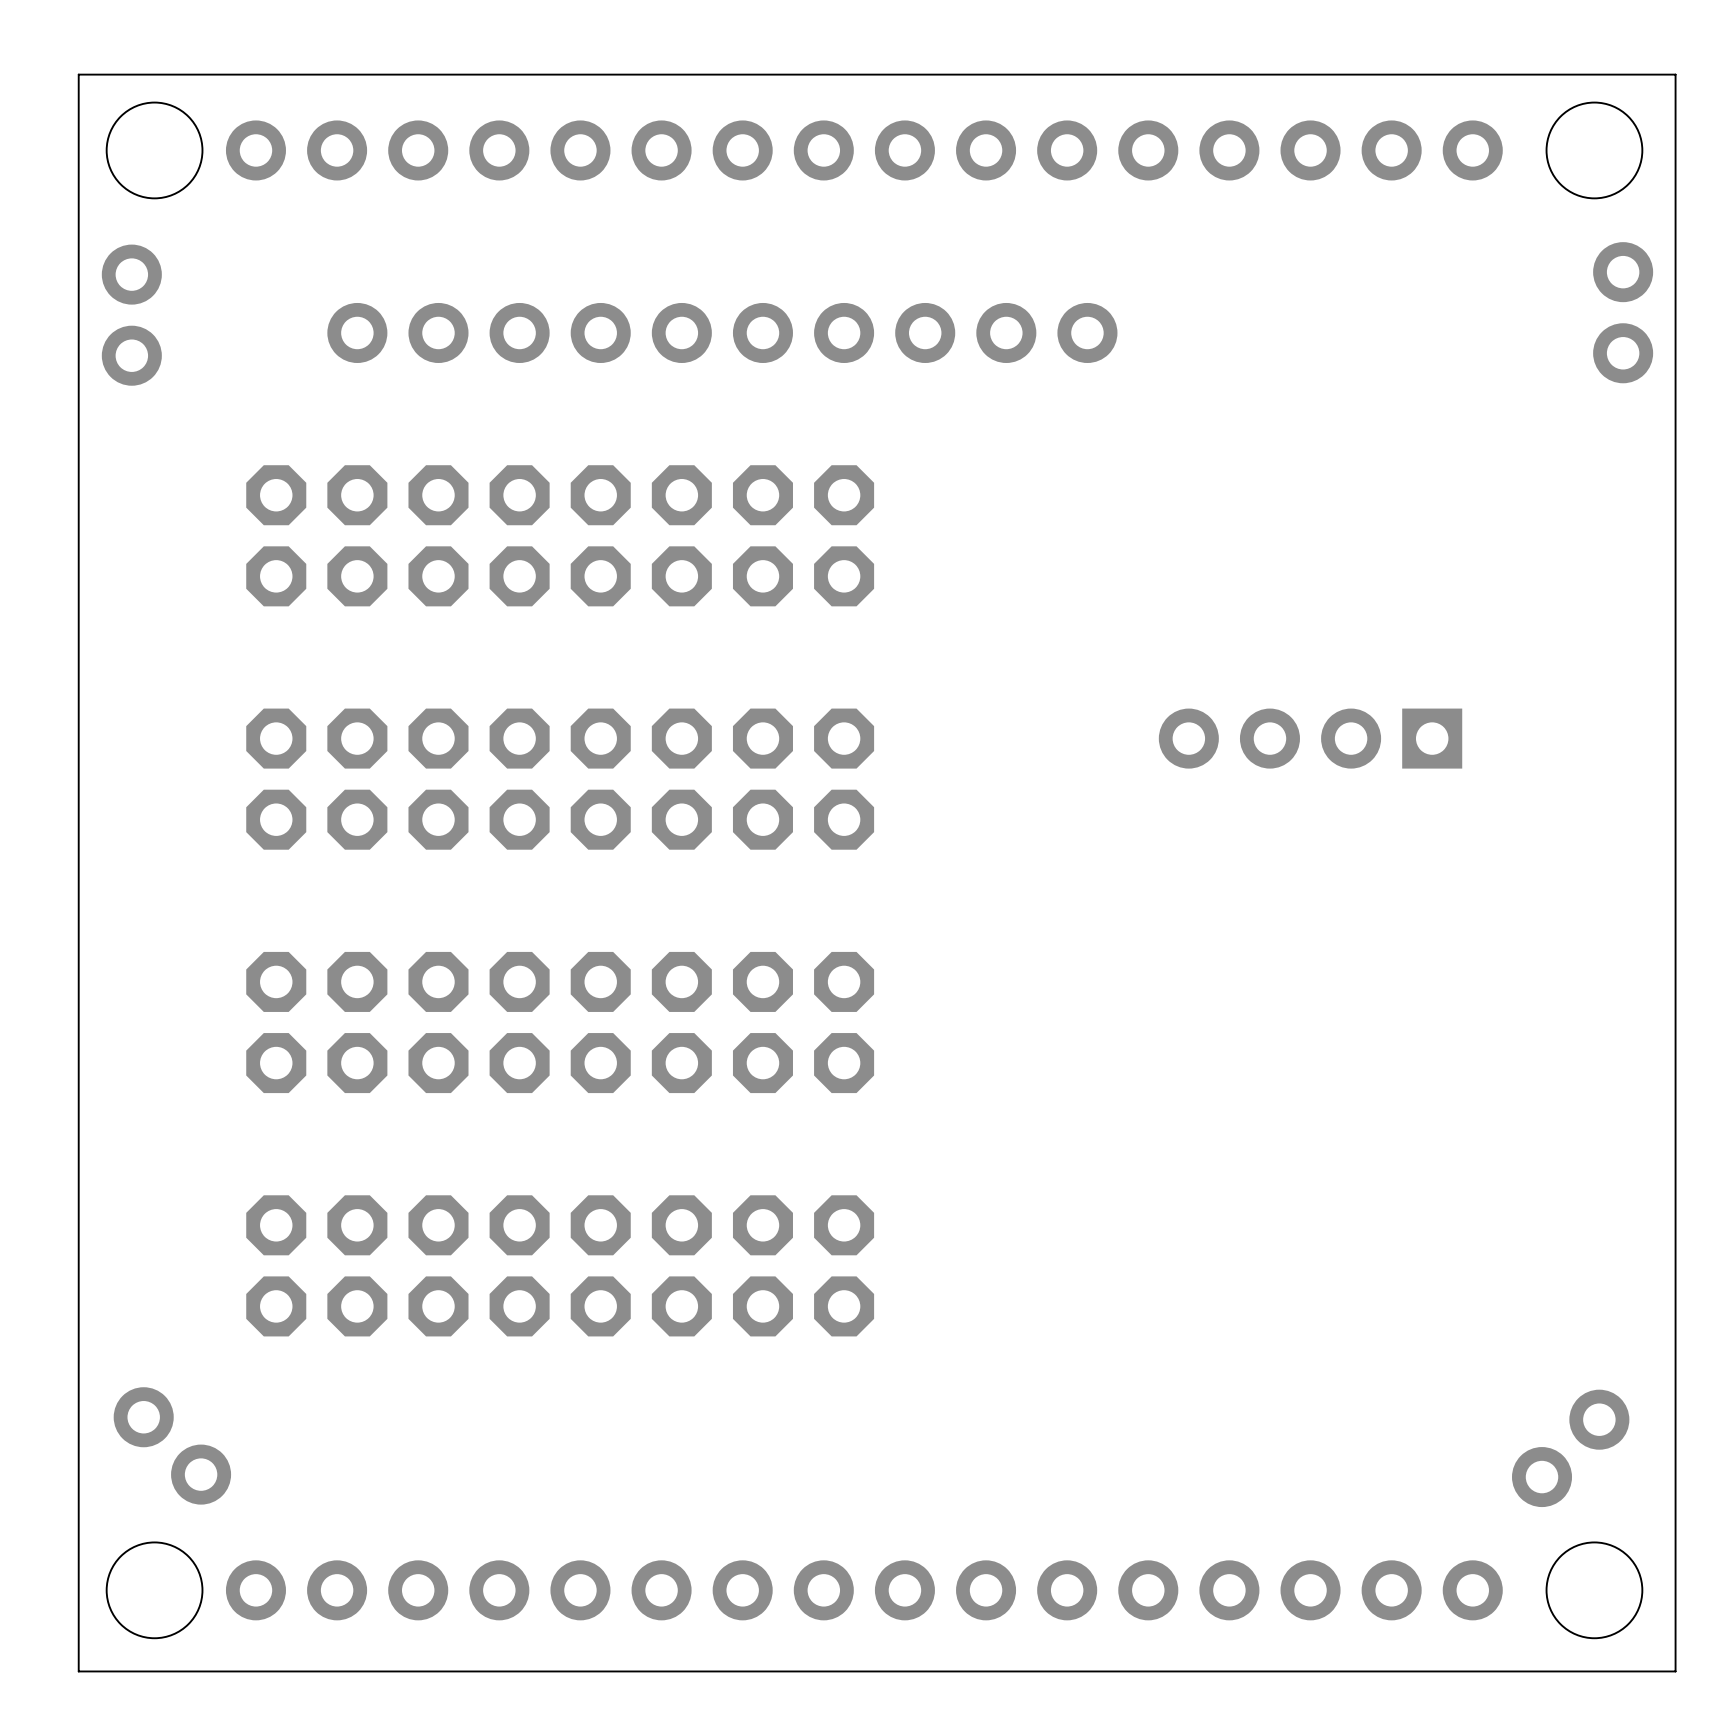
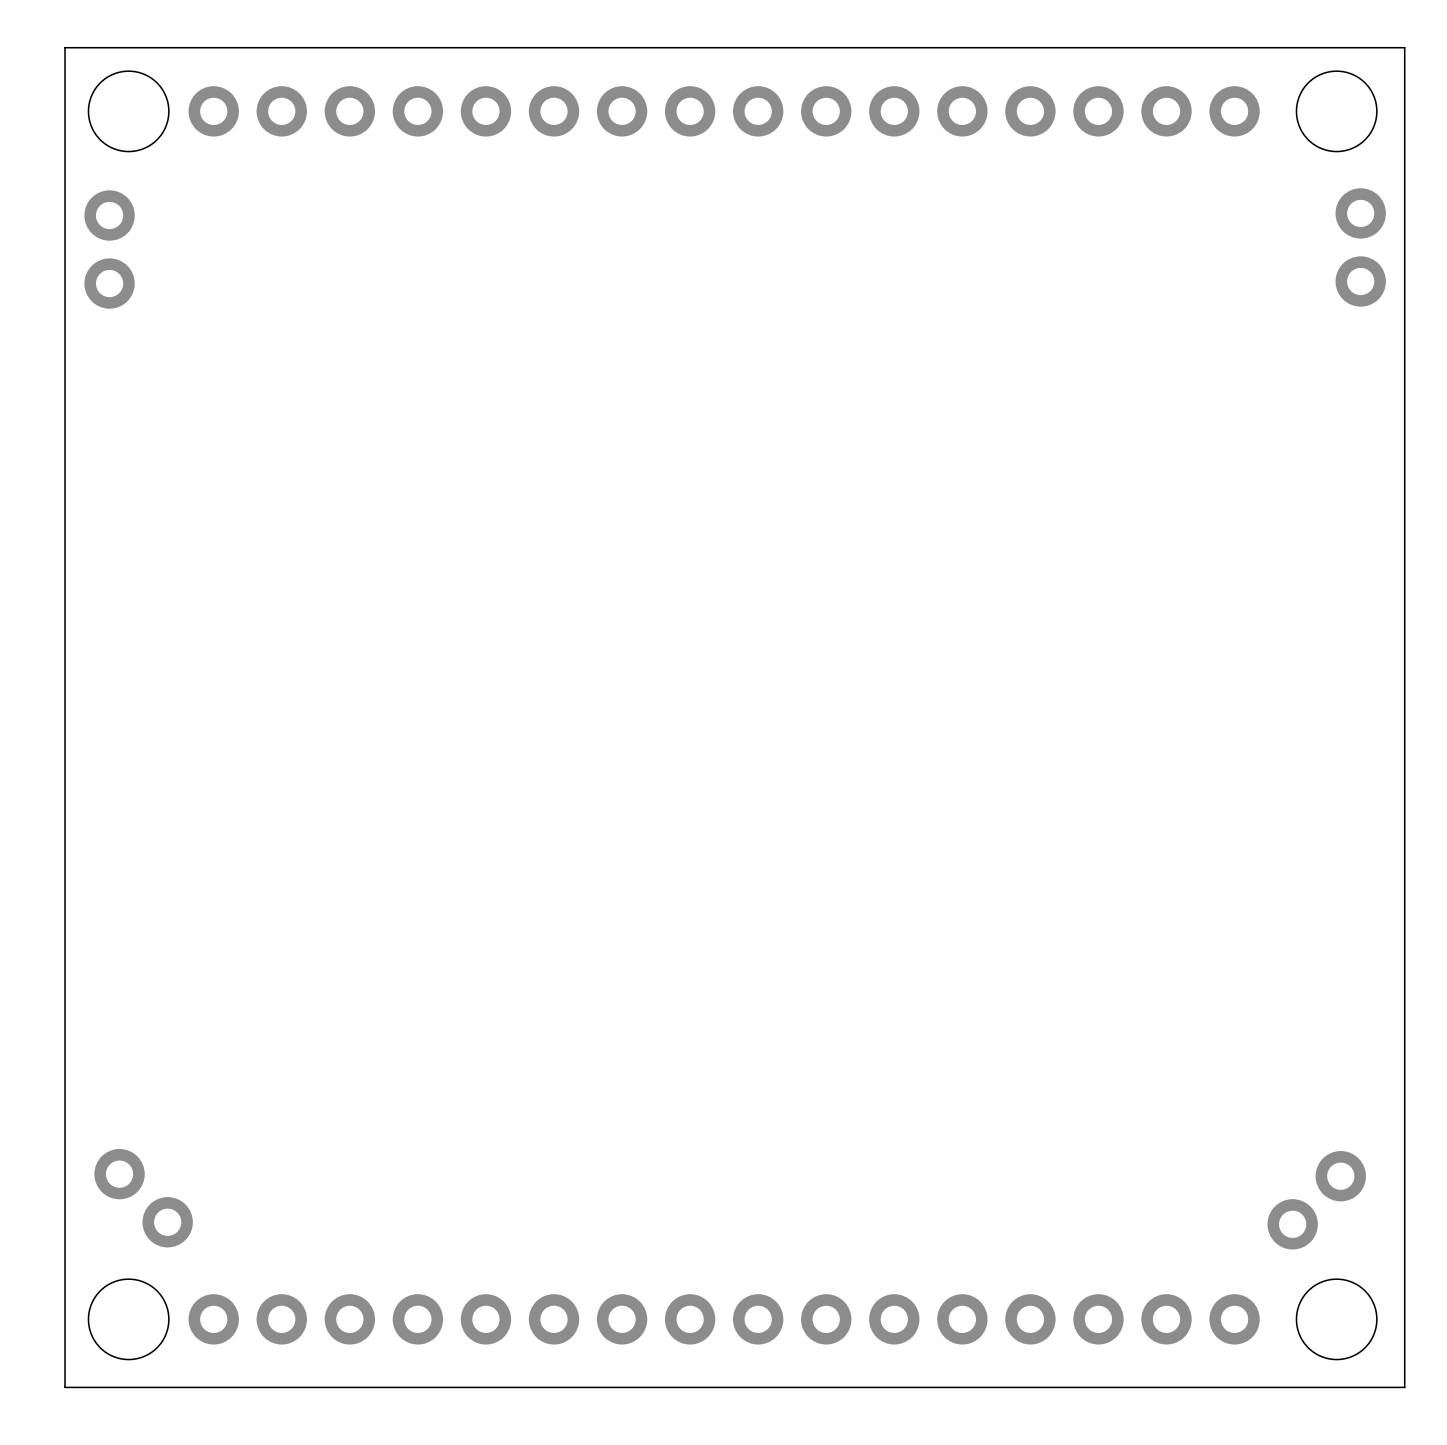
part: (722, 332) -> none
part: (560, 535) -> none
part: (1310, 738) -> none
part: (560, 779) -> none
part: (560, 1022) -> none
part: (560, 1265) -> none

